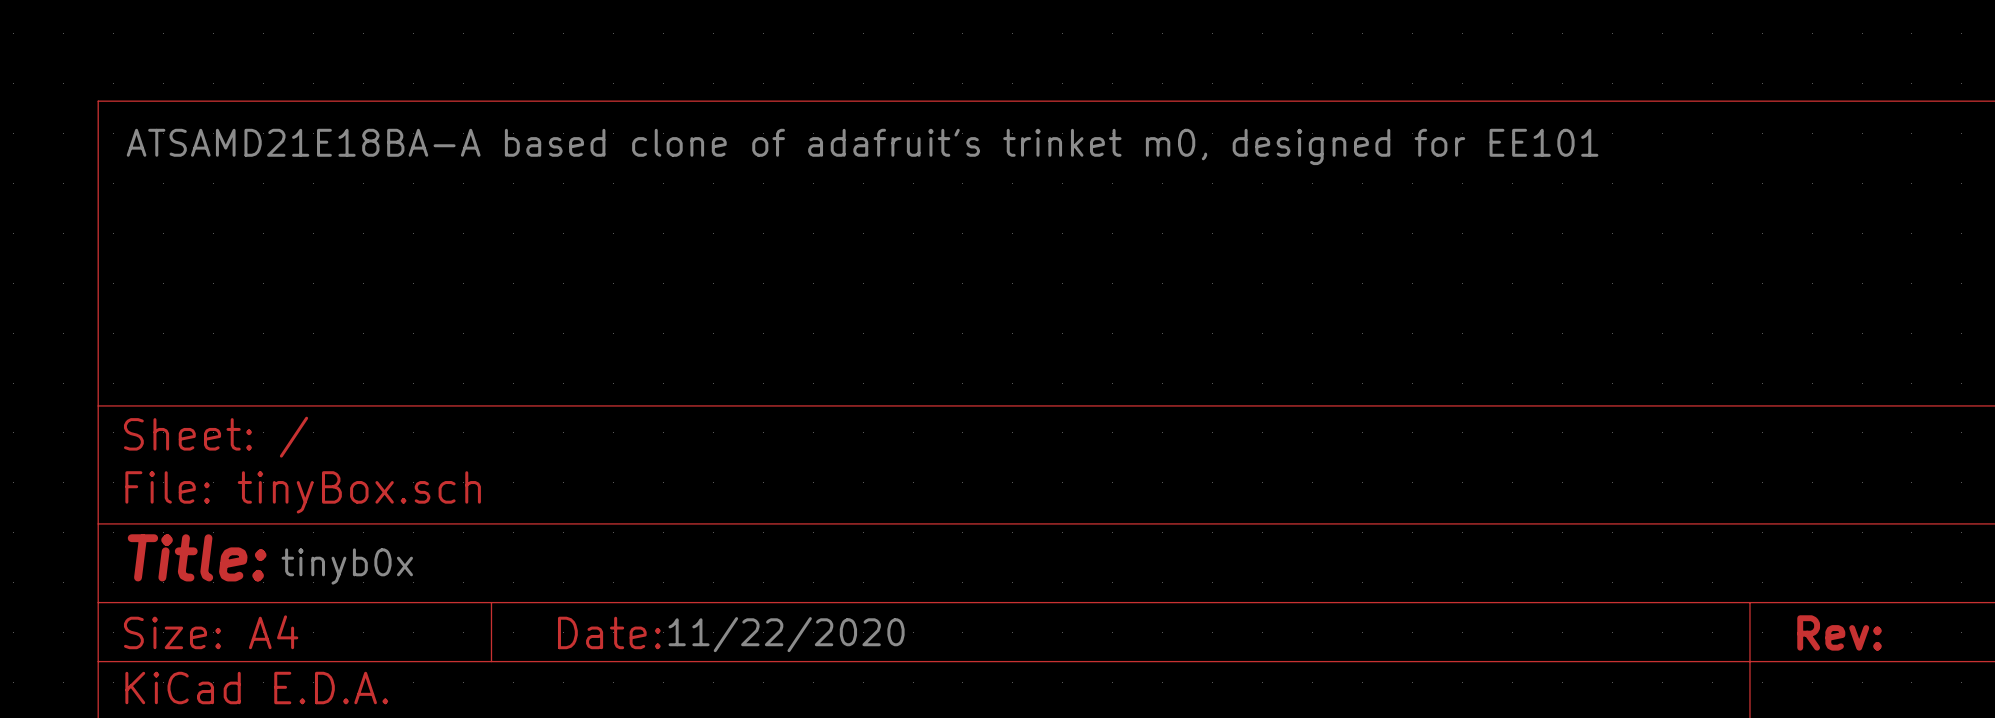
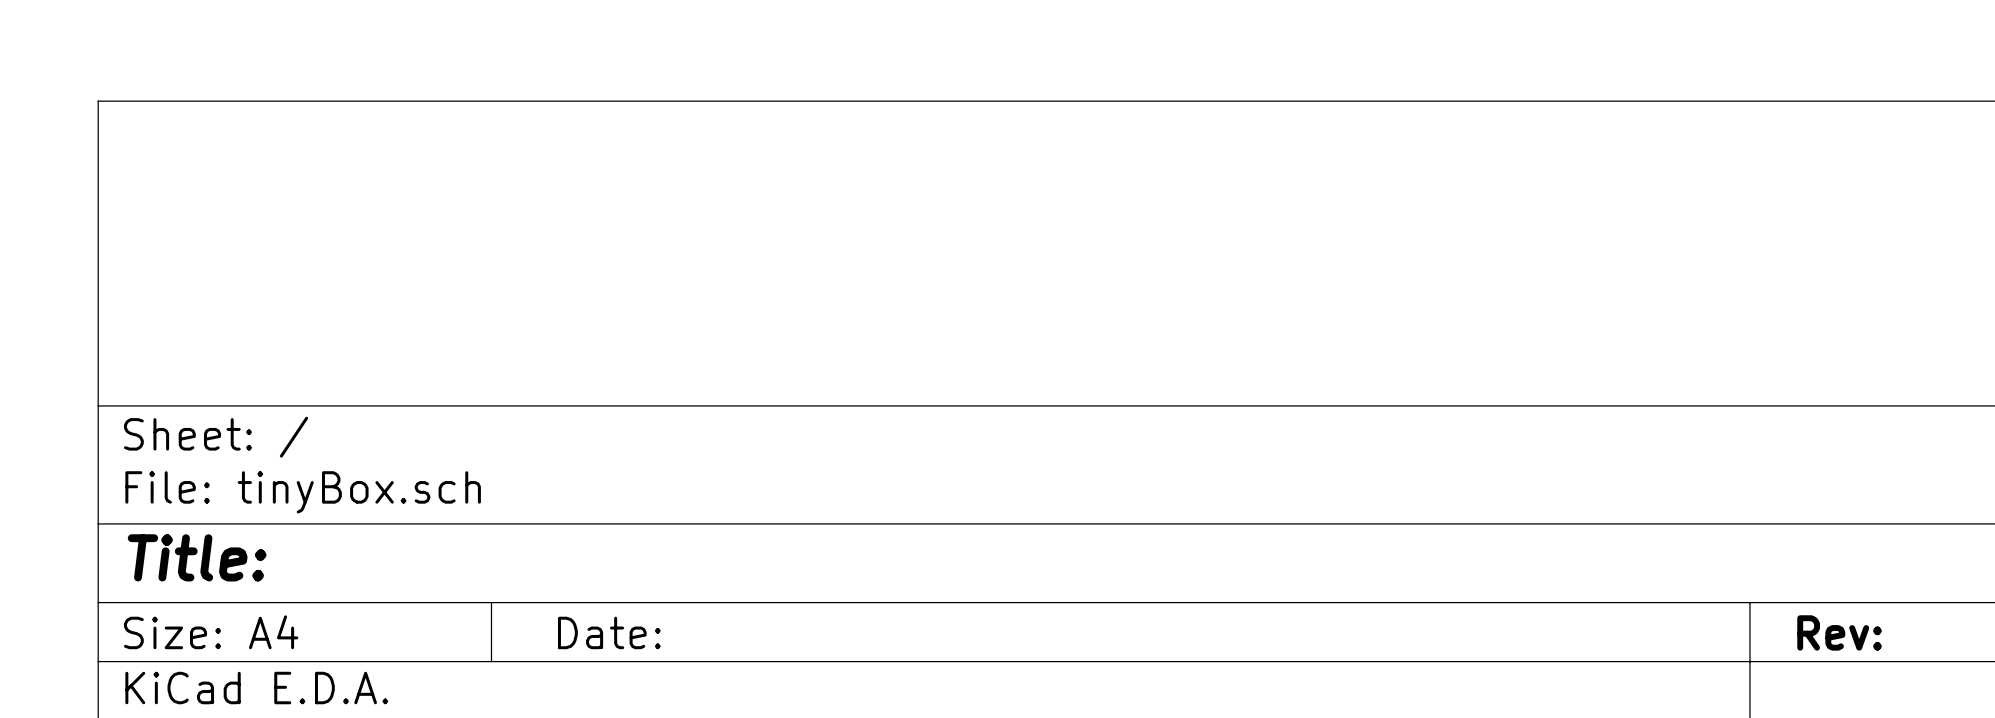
text: ATSAMD21E18BA-A based clone of adafruit's trinket m0, designed for EE101 (862, 146) -> none
text: tinyb0x (347, 566) -> none
text: 11/22/2020 (786, 634) -> none

